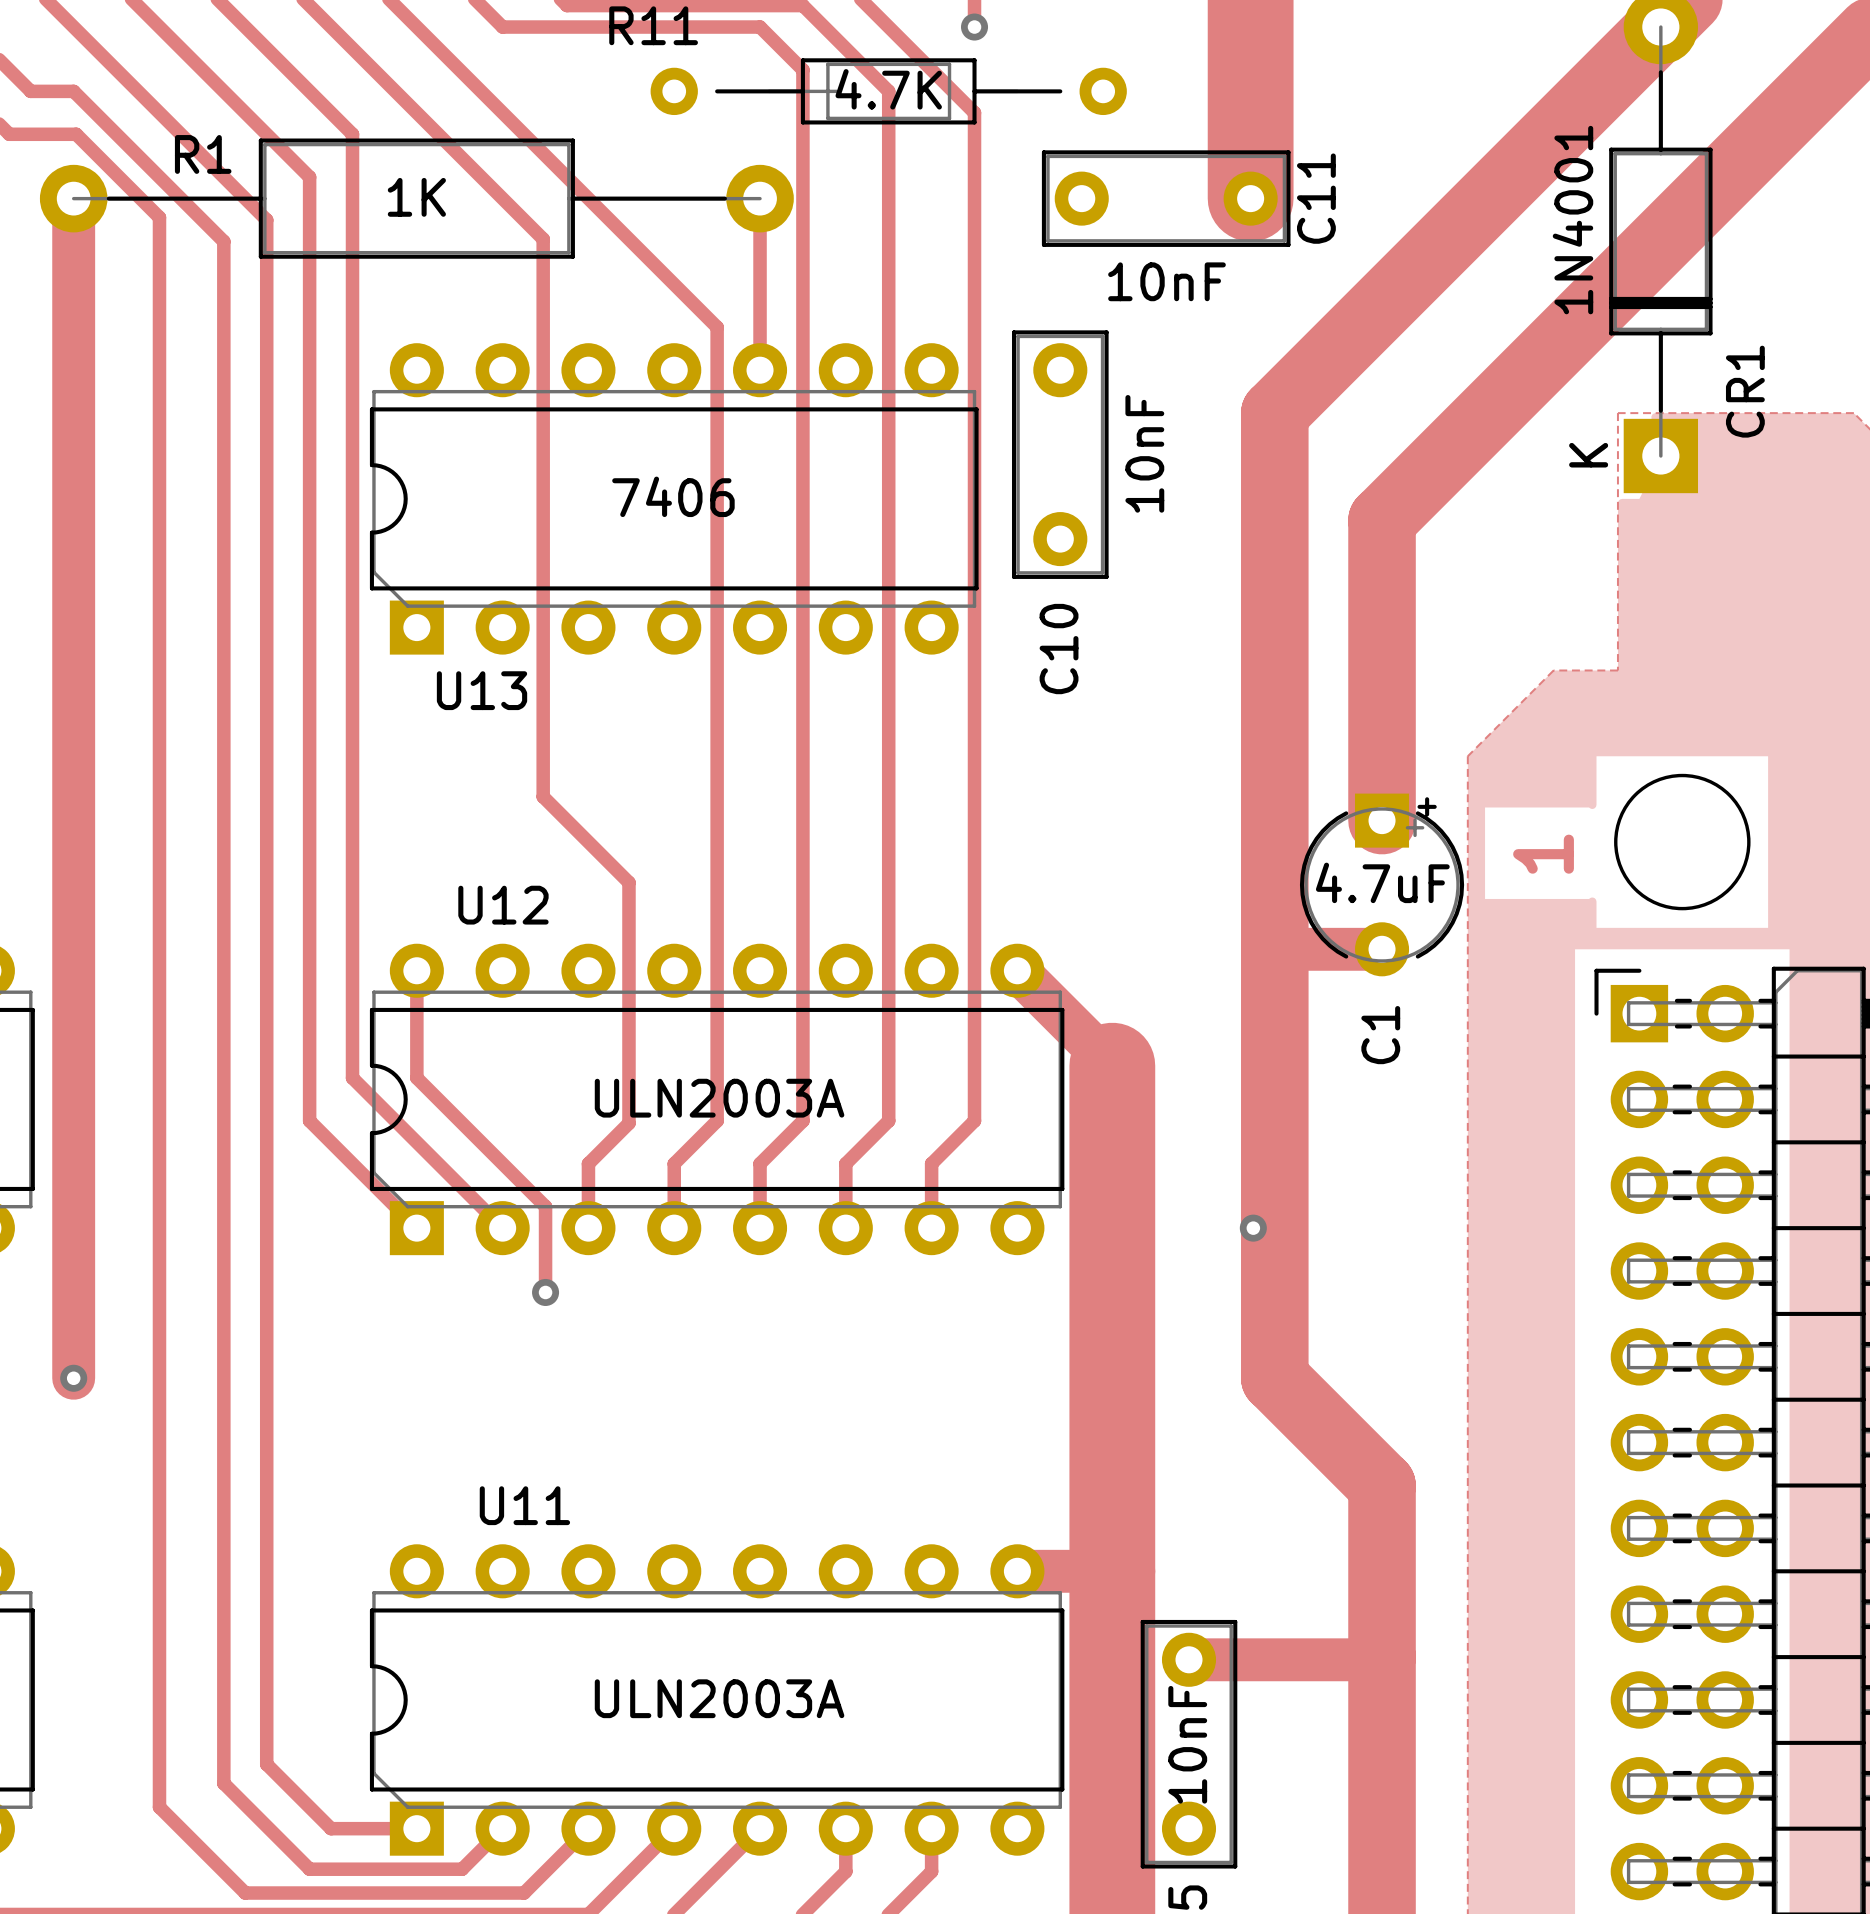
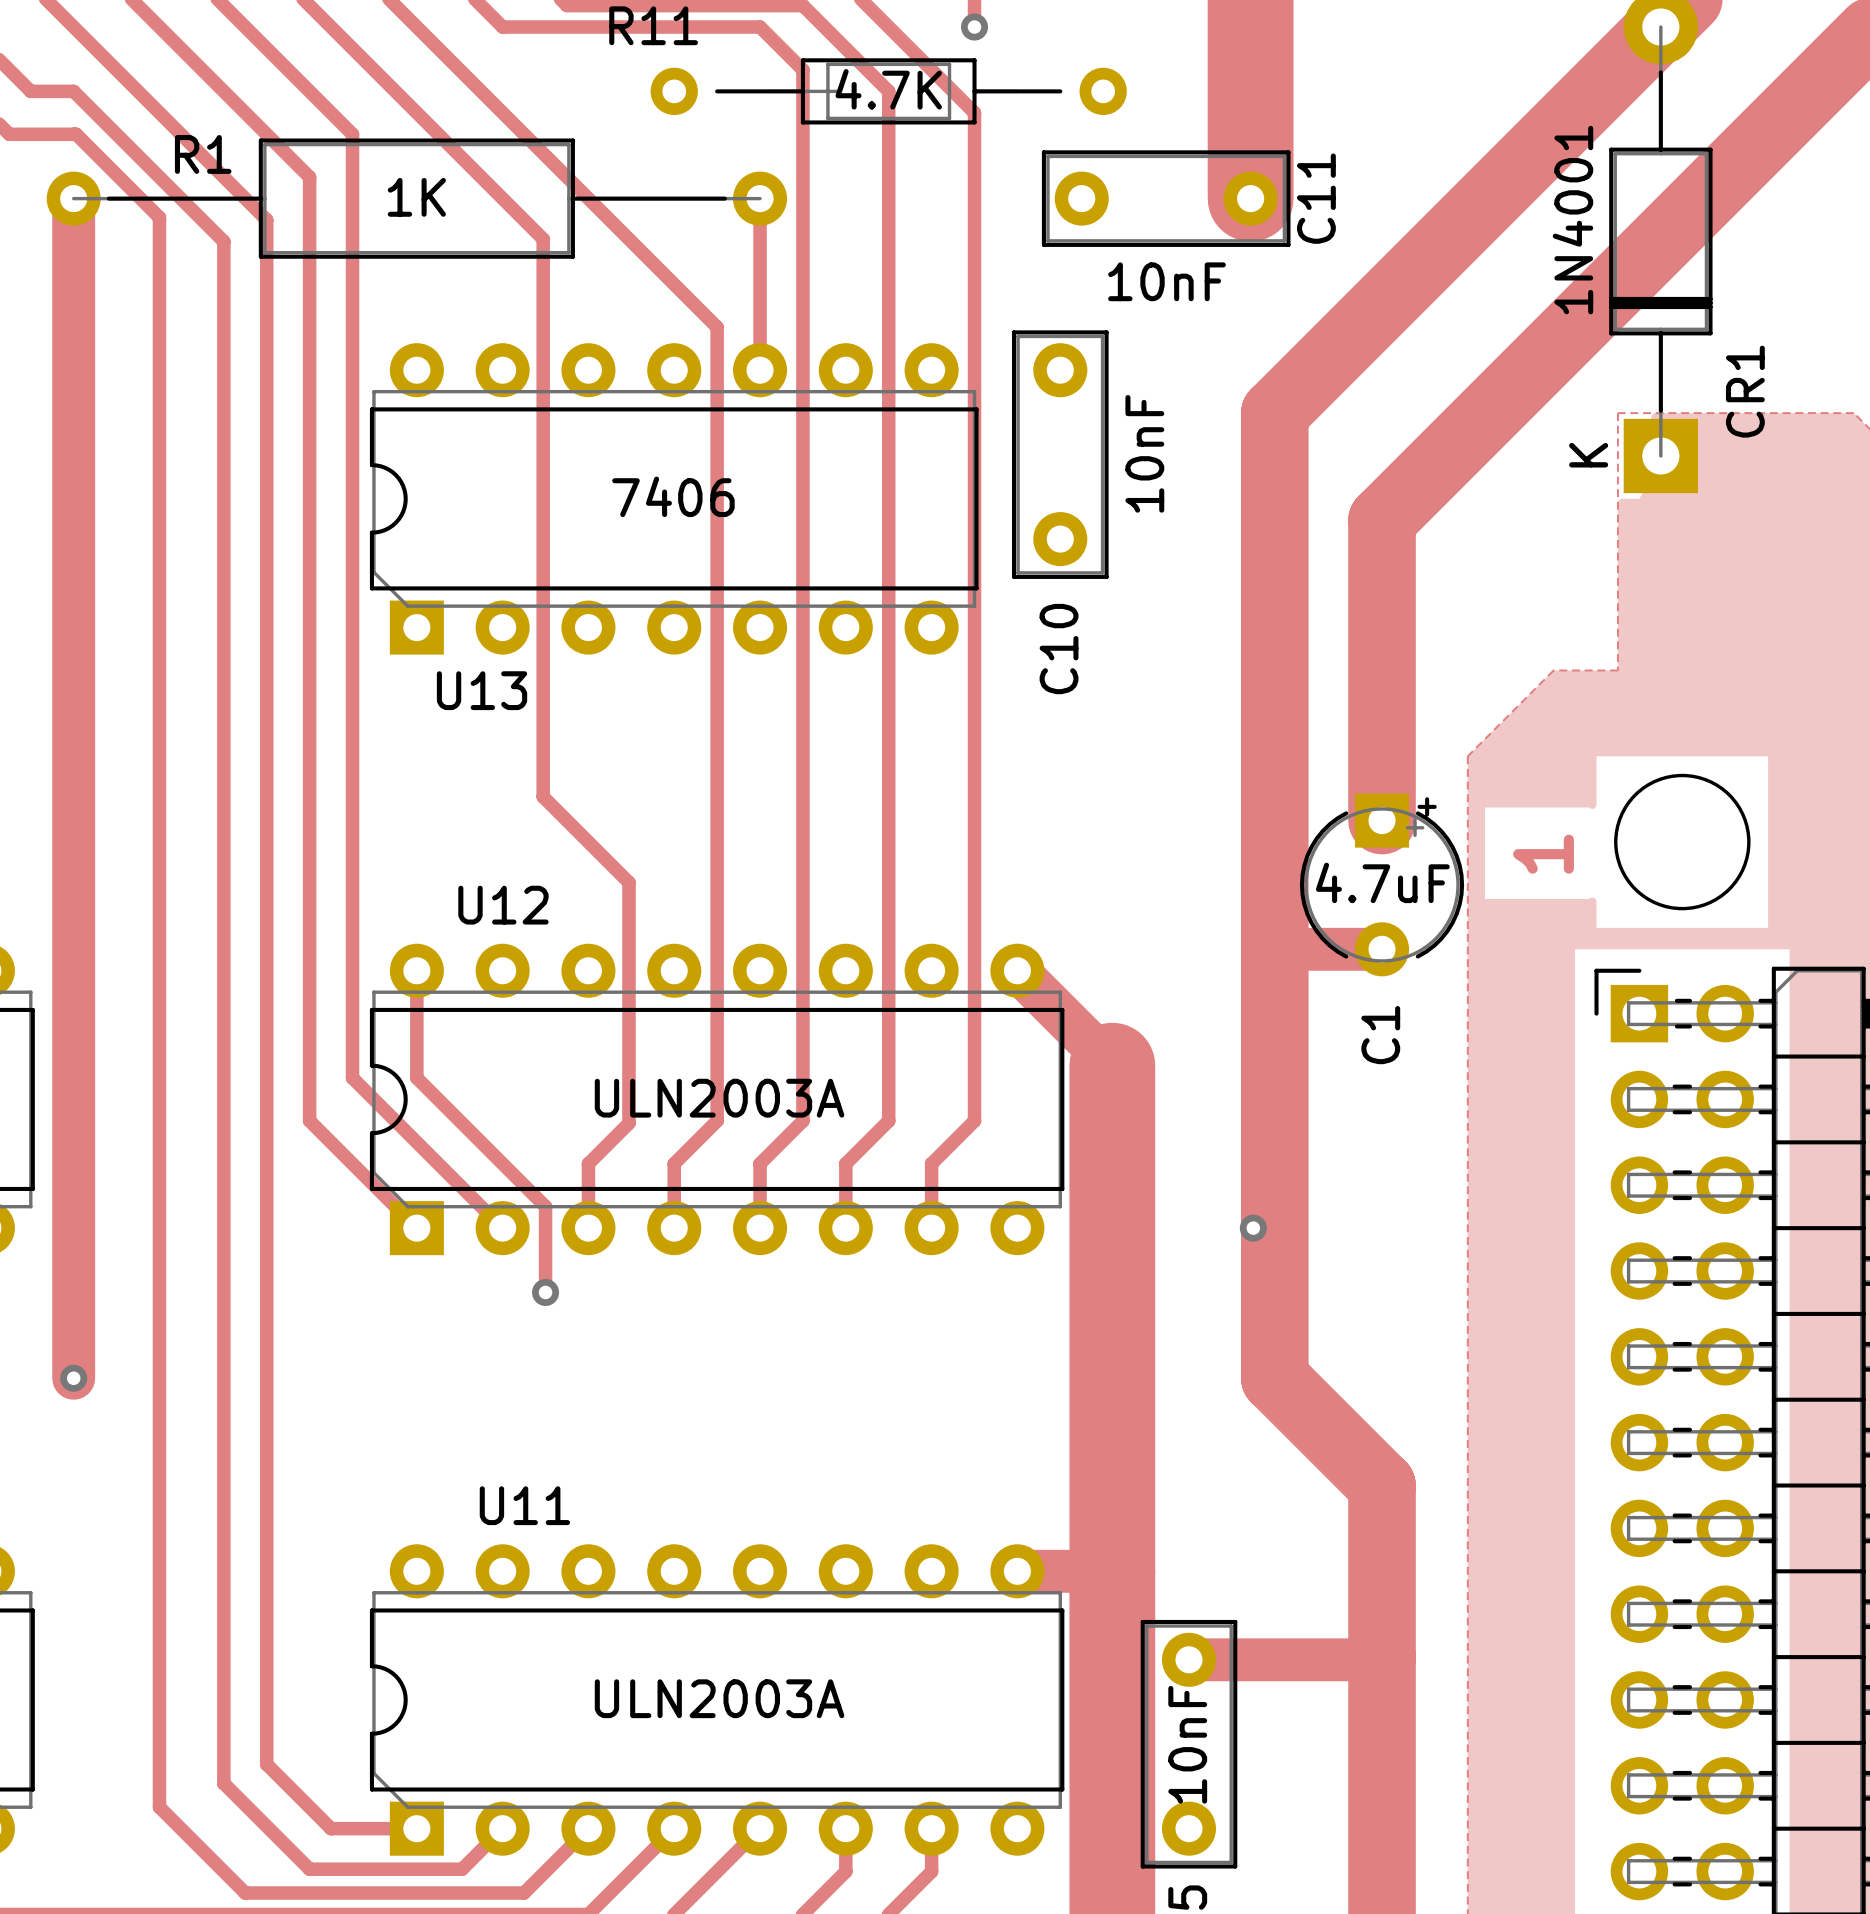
R1 footprint: [39, 138, 794, 259] -> [46, 138, 788, 259]

